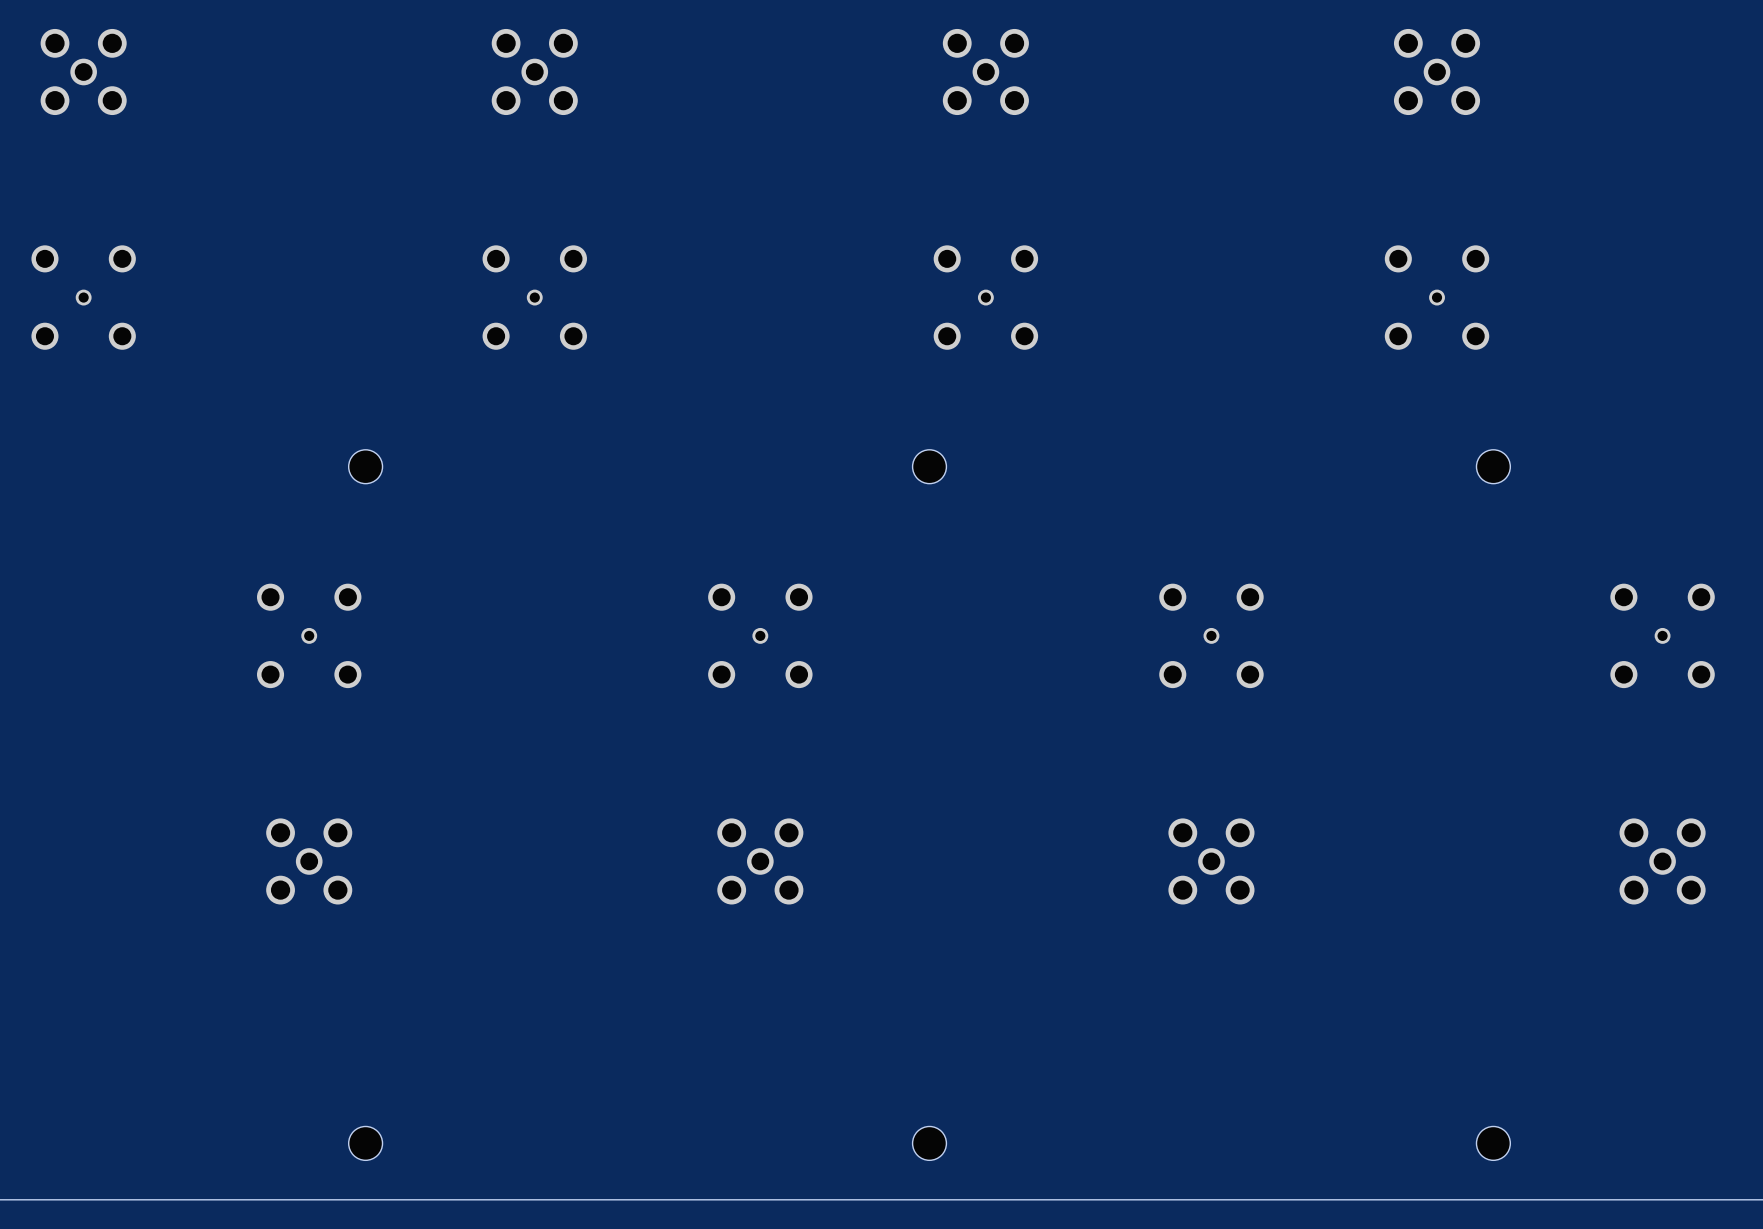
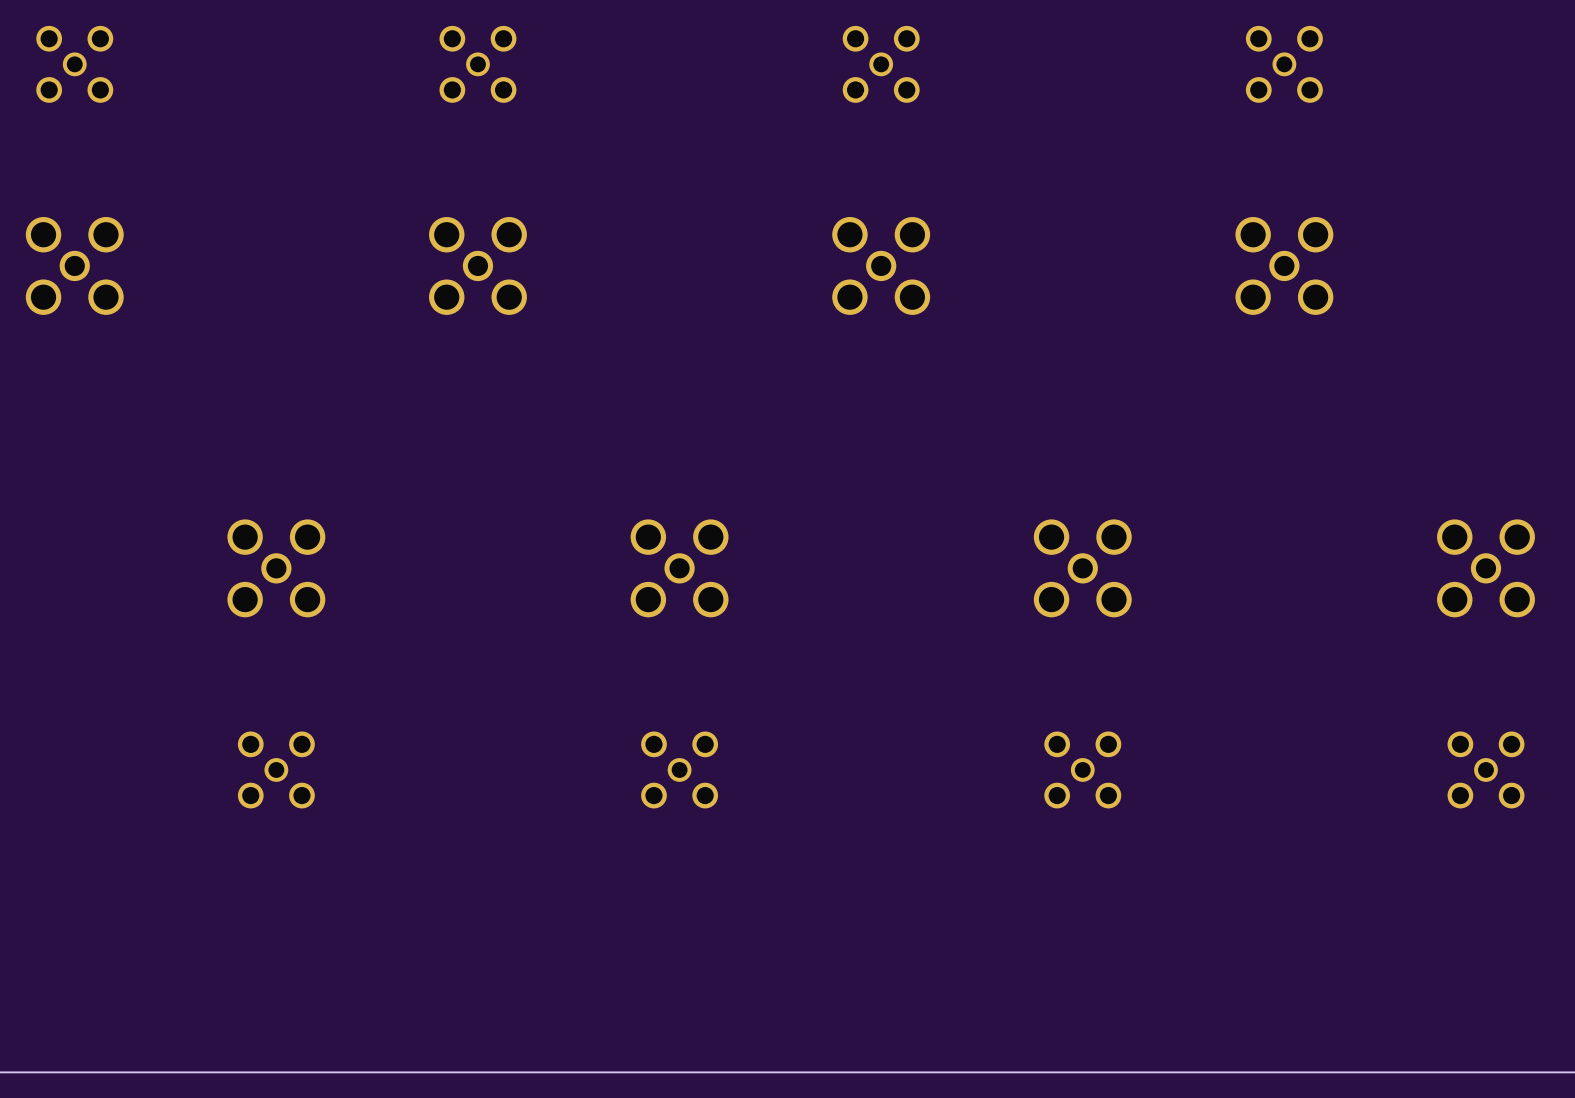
part footprint: [31, 245, 136, 350] -> [25, 216, 124, 315]
part footprint: [482, 245, 587, 350] -> [429, 216, 527, 315]
part footprint: [933, 245, 1039, 350] -> [832, 216, 931, 315]
part footprint: [1384, 245, 1490, 350] -> [1235, 216, 1334, 315]
hole: (365, 466) -> none
hole: (929, 466) -> none
hole: (1493, 466) -> none
part footprint: [256, 583, 362, 689] -> [227, 519, 326, 618]
part footprint: [708, 583, 813, 689] -> [630, 519, 729, 618]
part footprint: [1159, 583, 1264, 689] -> [1033, 519, 1132, 618]
part footprint: [1610, 583, 1715, 689] -> [1437, 519, 1535, 618]
hole: (365, 1143) -> none
hole: (929, 1143) -> none
hole: (1493, 1143) -> none

